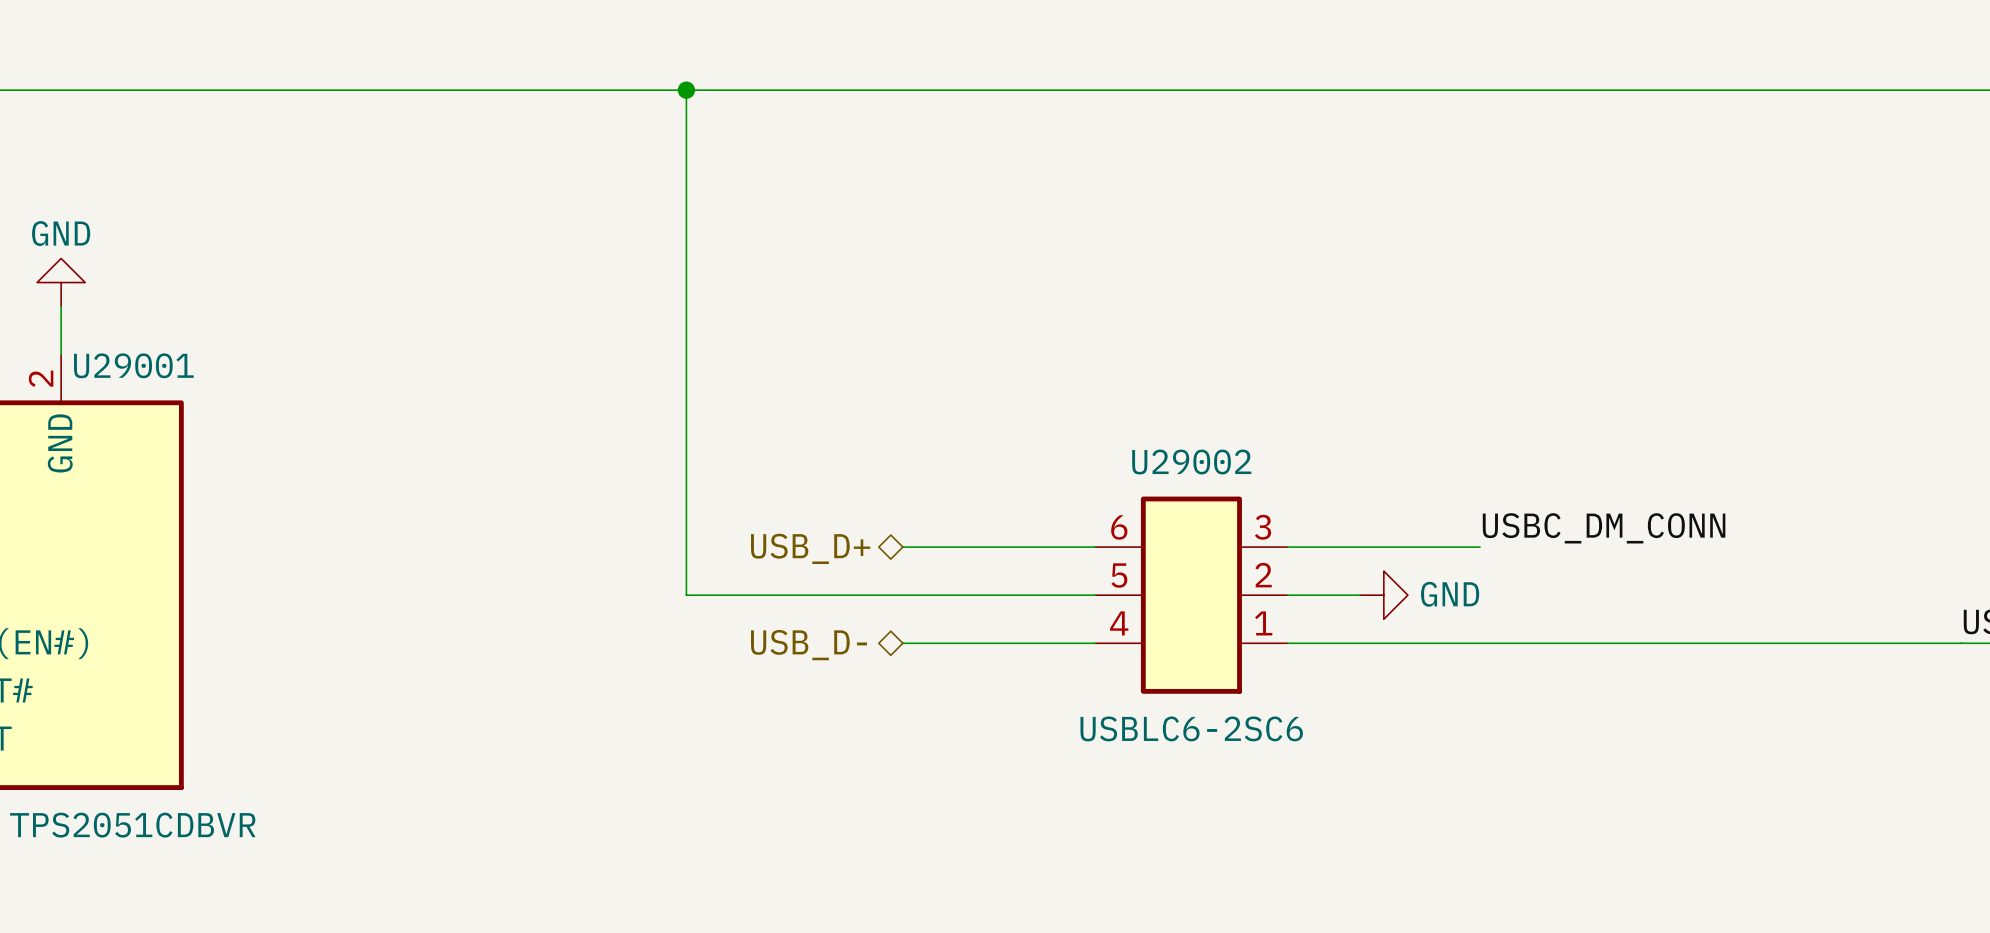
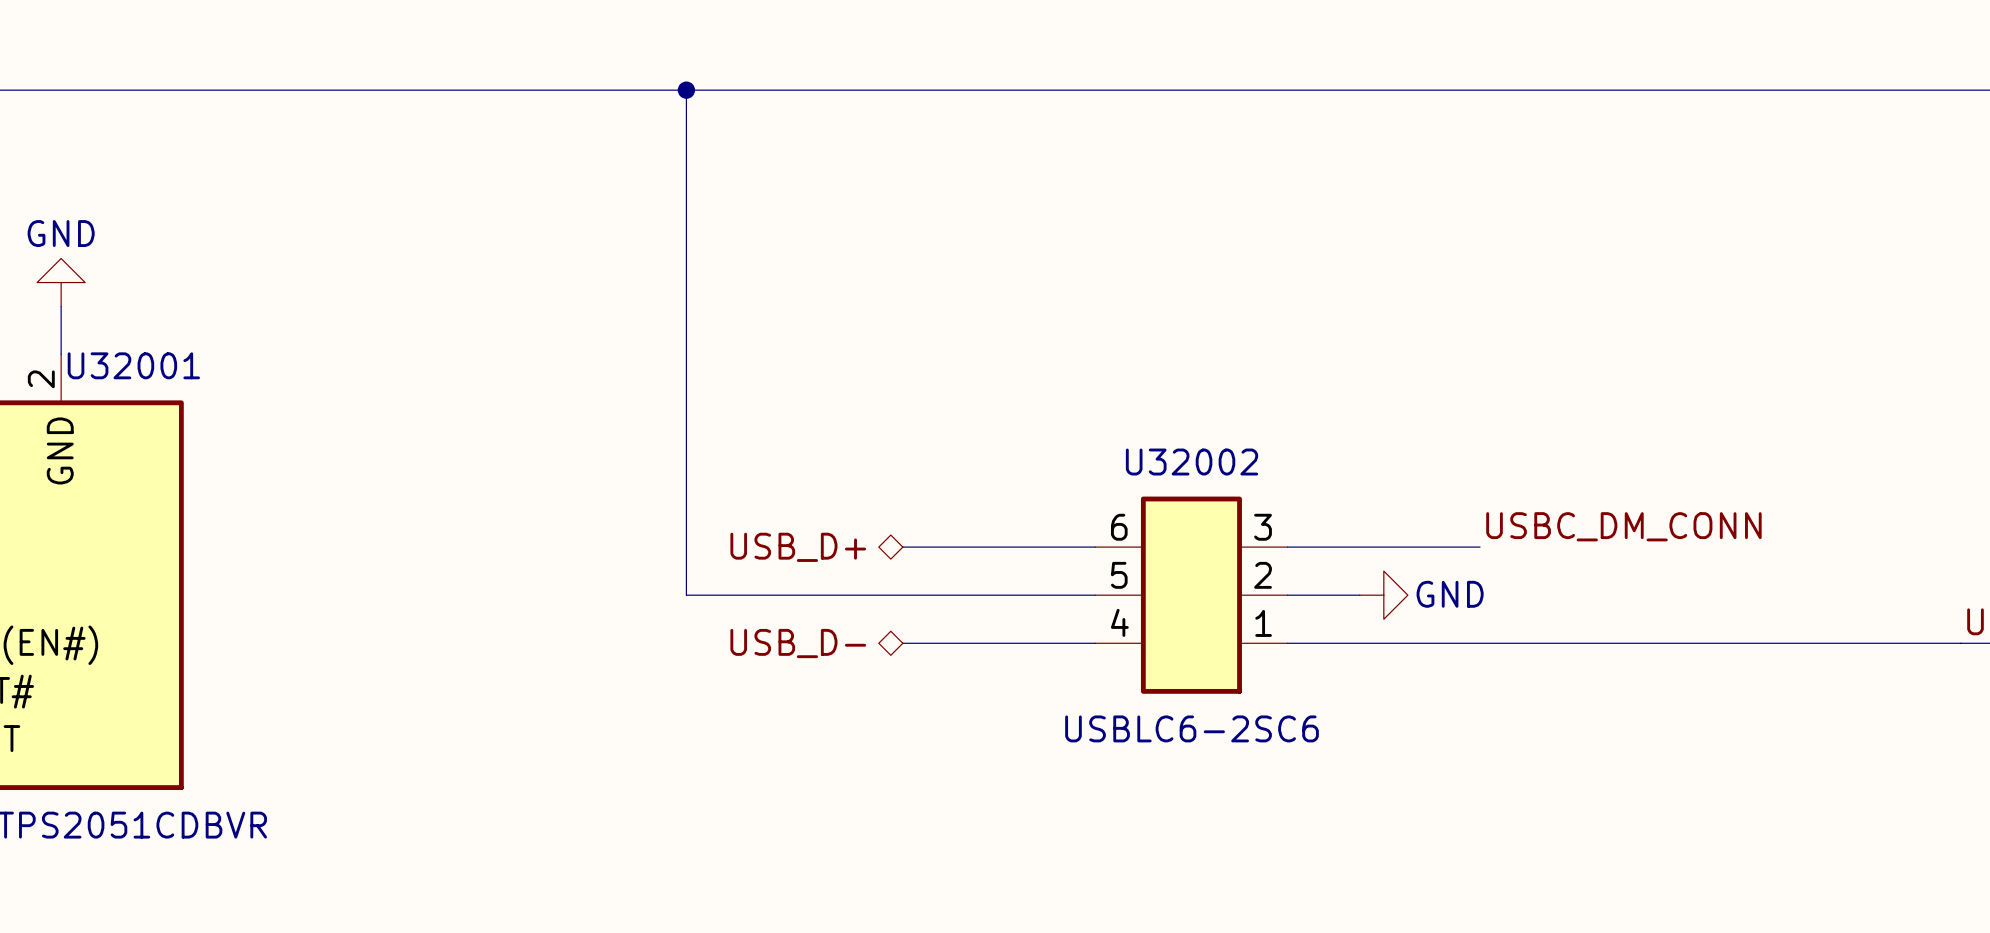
U29001 name: U29001 (133, 365) -> U32001 (133, 365)
U29002 name: U29002 (1191, 462) -> U32002 (1192, 462)

